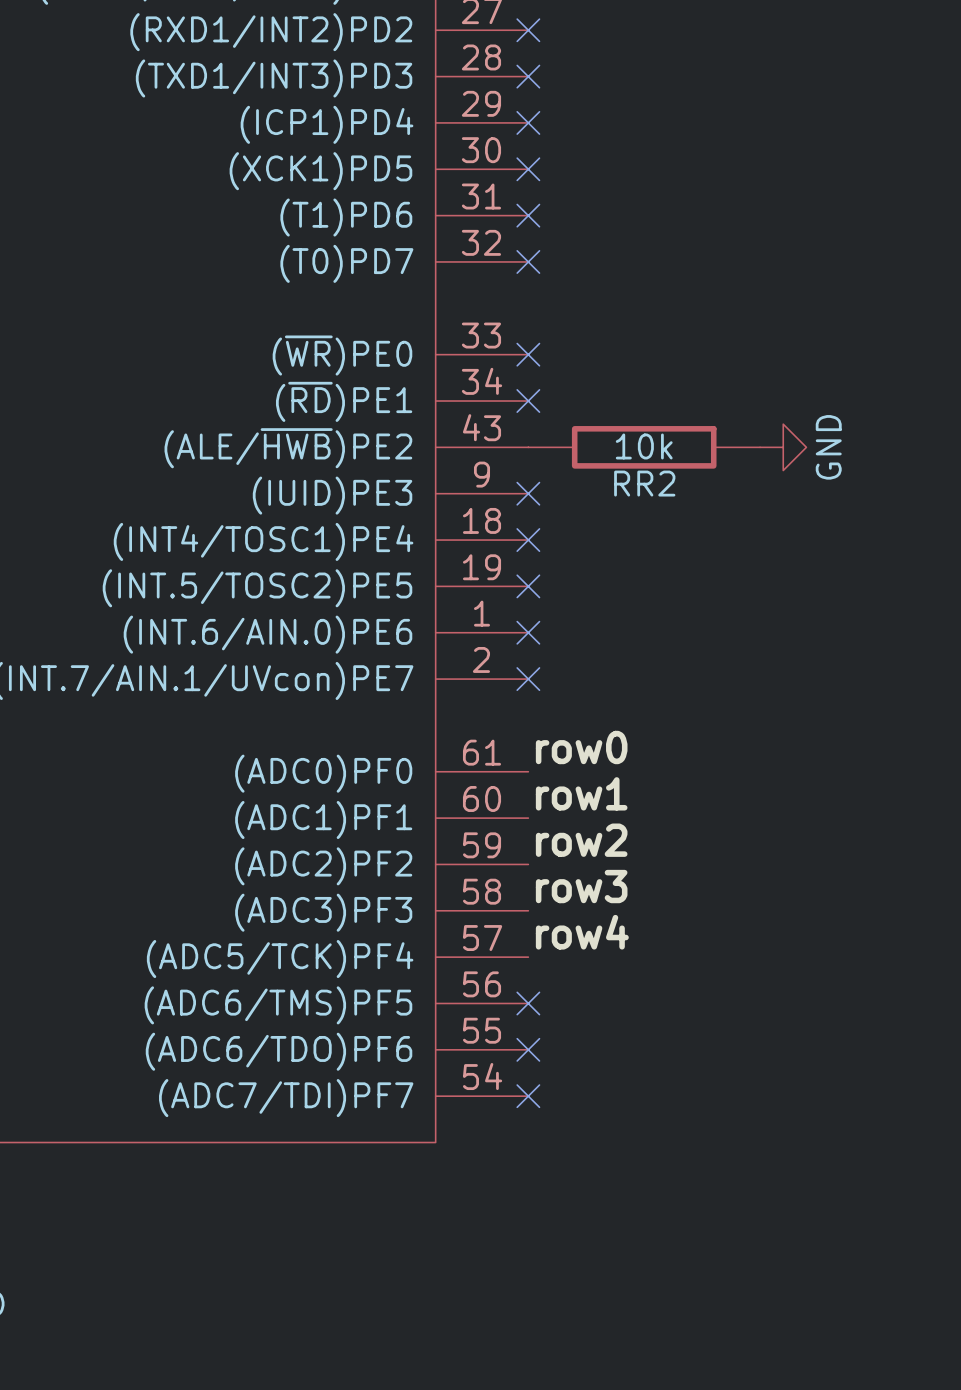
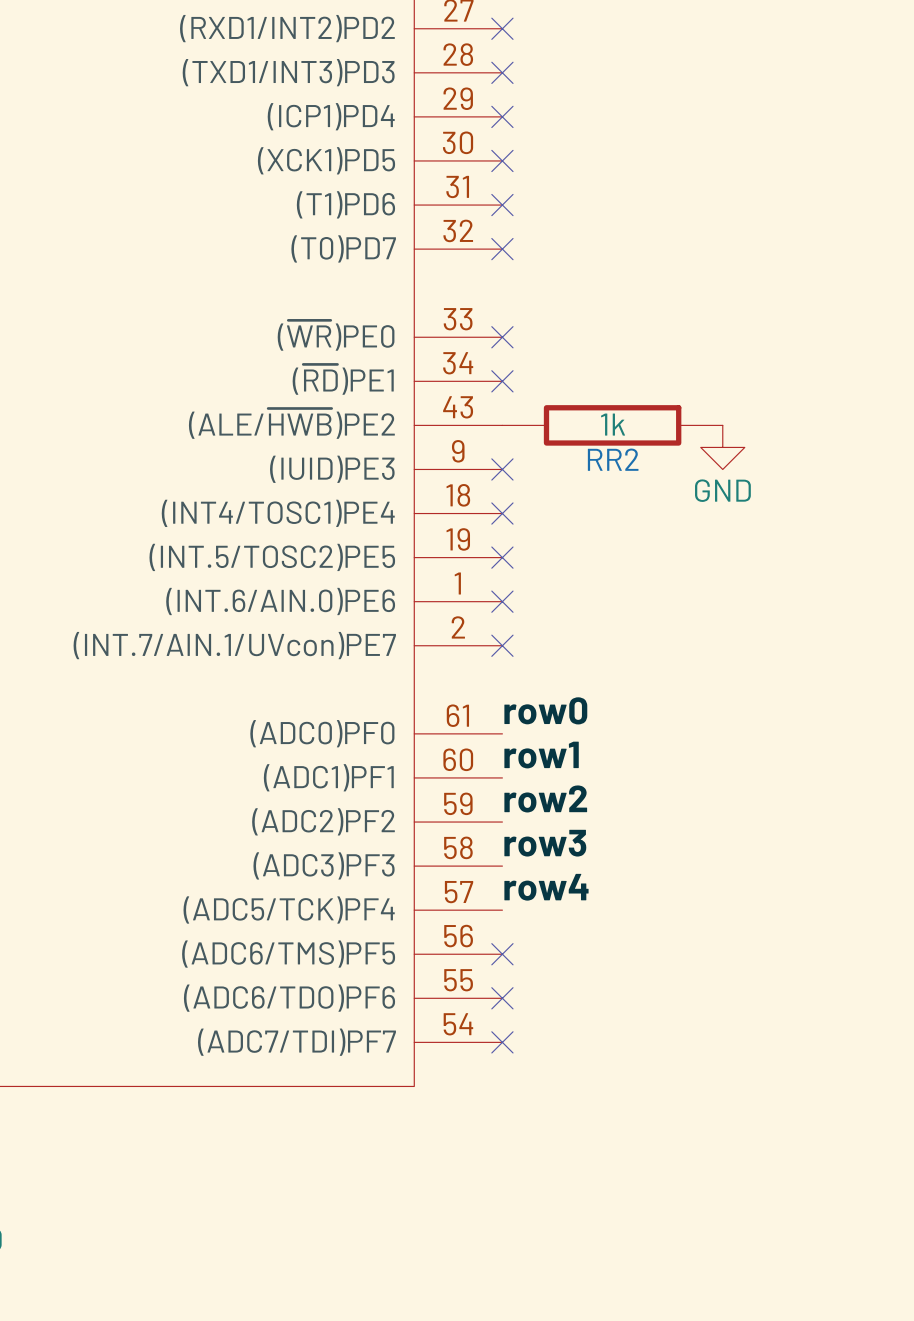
RR2 value: 10k (644, 446) -> 1k (613, 424)
power symbol rotation: 0° (783, 447) -> 90° clockwise (722, 447)
power symbol position: GND (783, 447) -> GND (722, 447)

